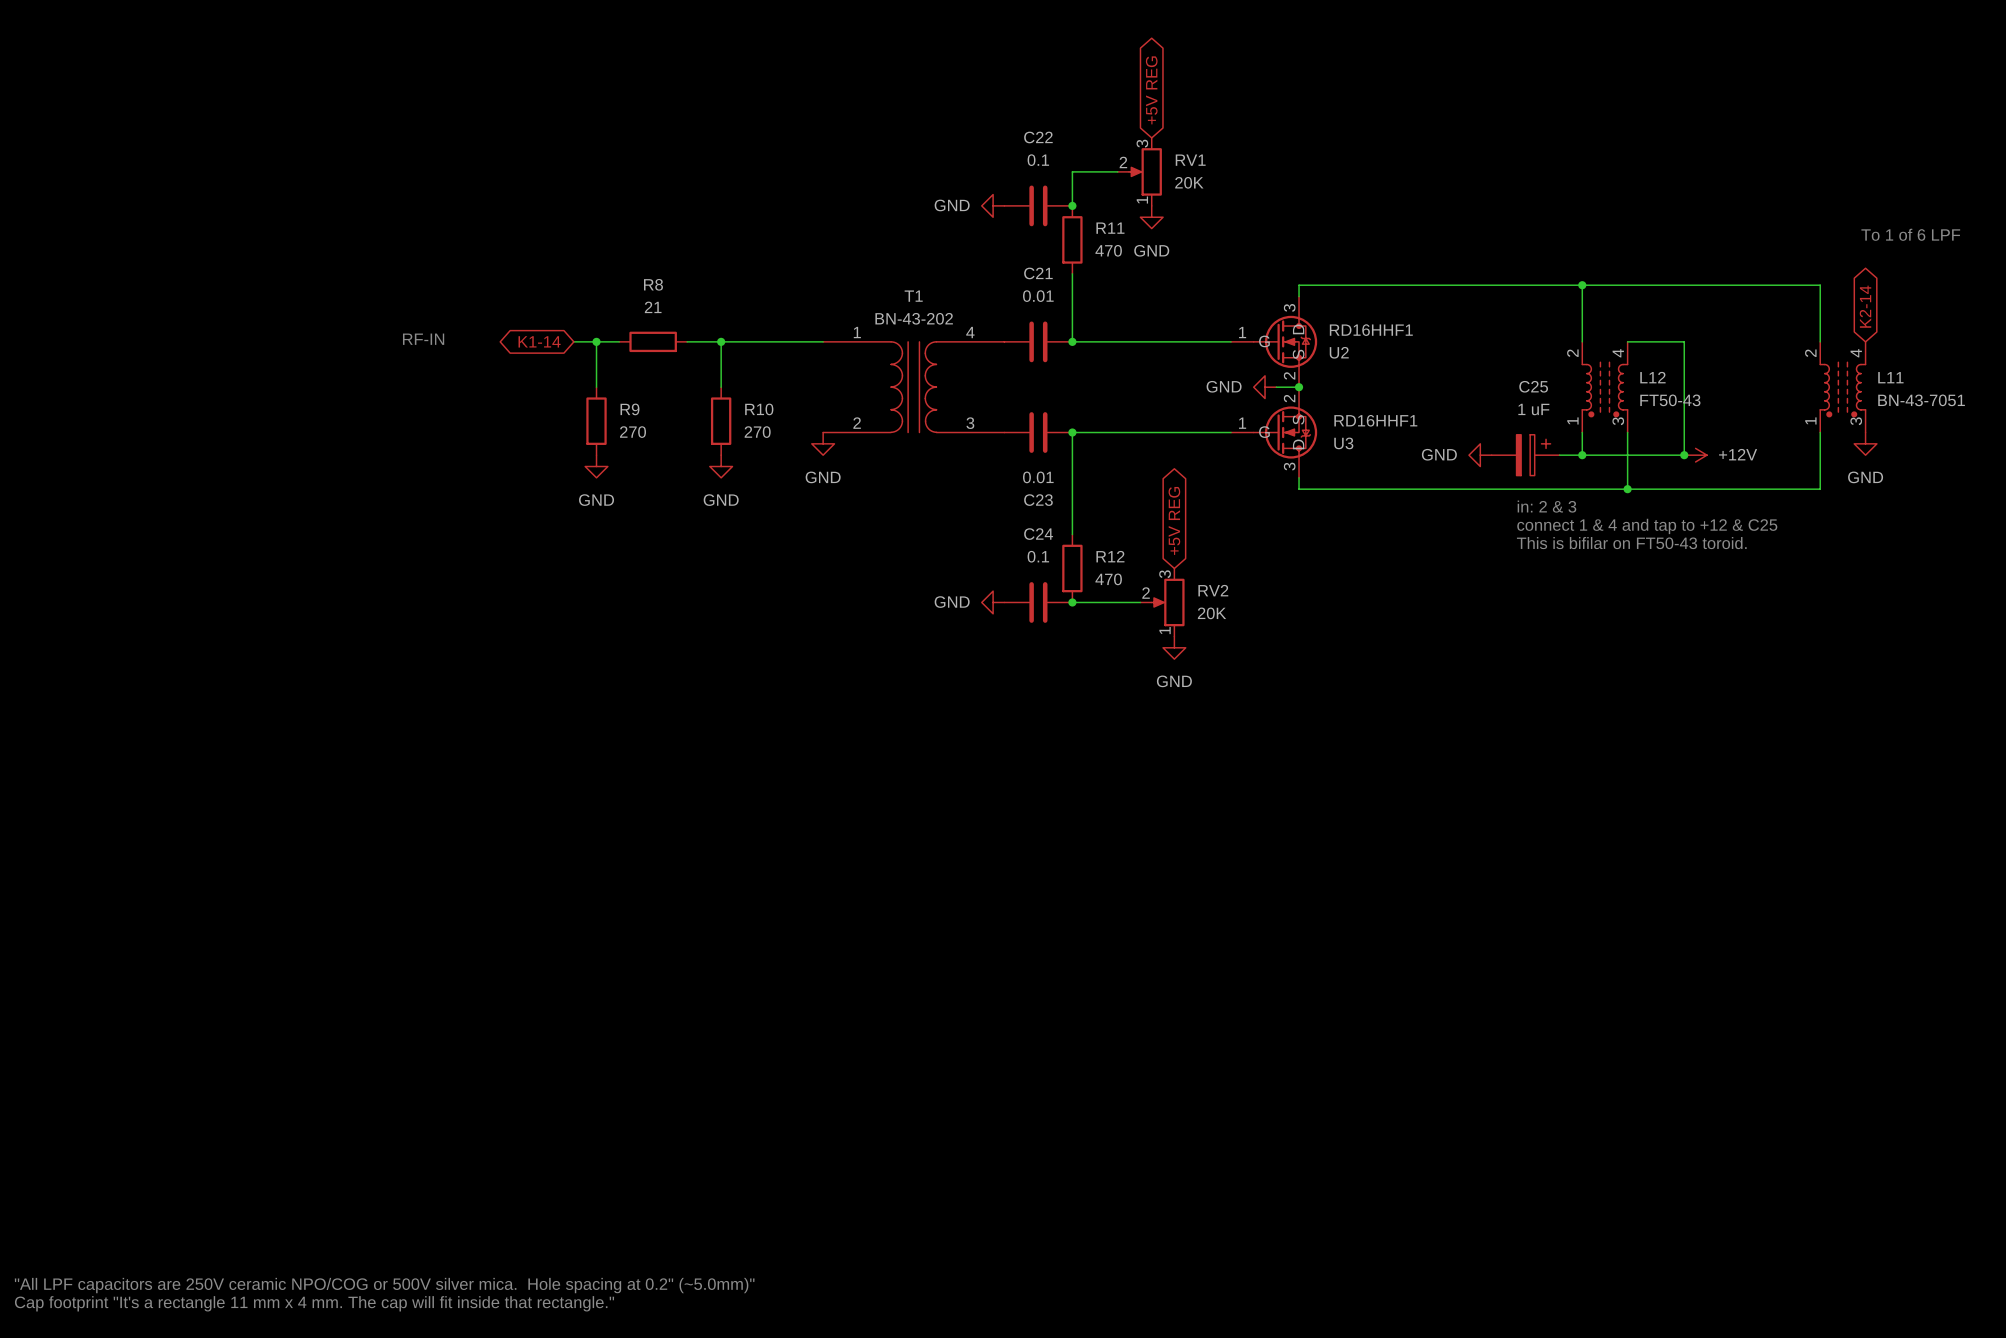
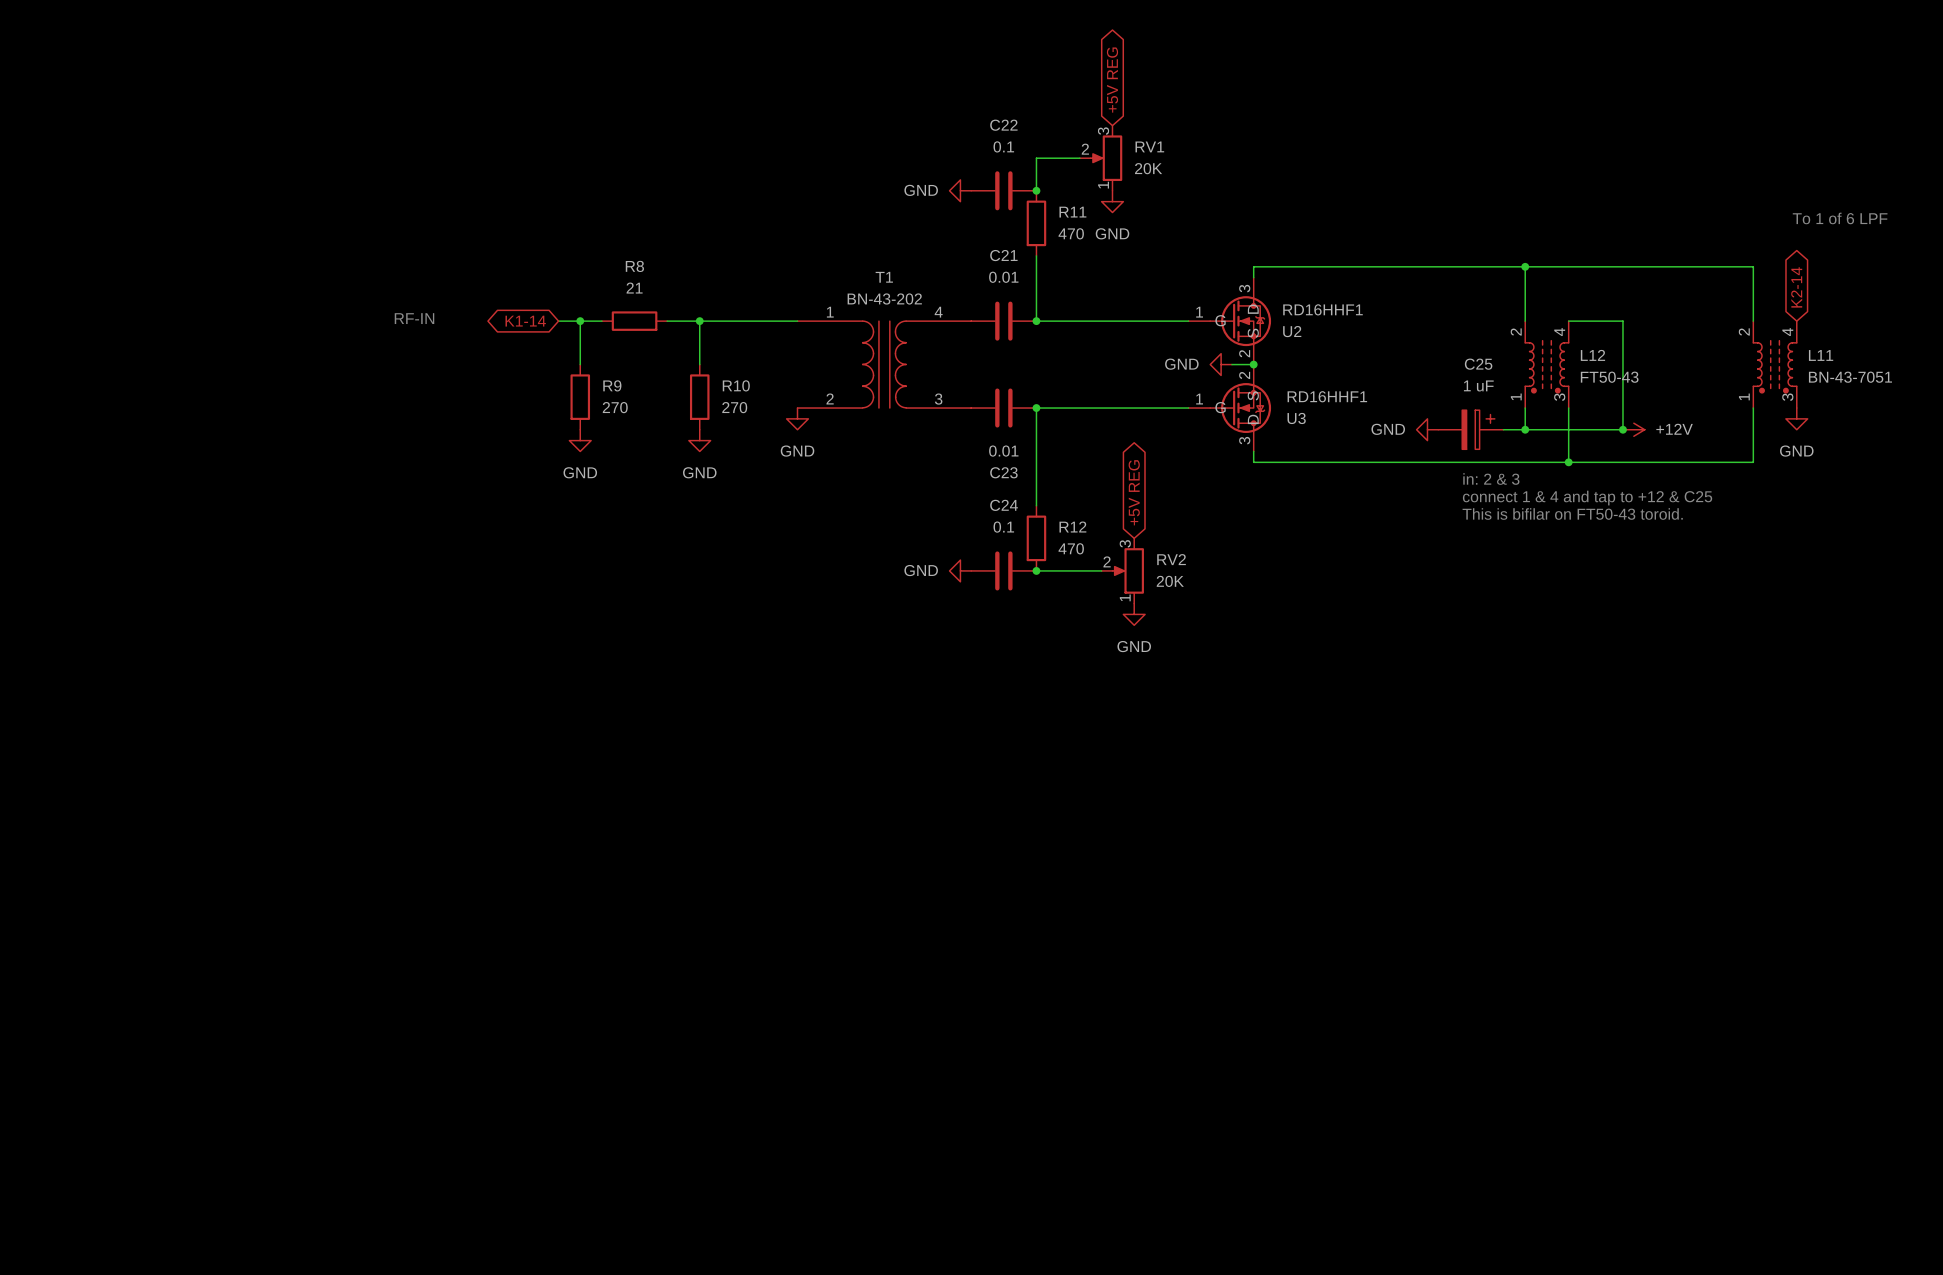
text: "All LPF capacitors are 250V ceramic NPO/COG or 500V silver mica. Hole spacing at 0.2" (~5.0mm)" (384, 1285) -> none
text: Cap footprint "It's a rectangle 11 mm x 4 mm. The cap will fit inside that rectangle." (314, 1303) -> none

